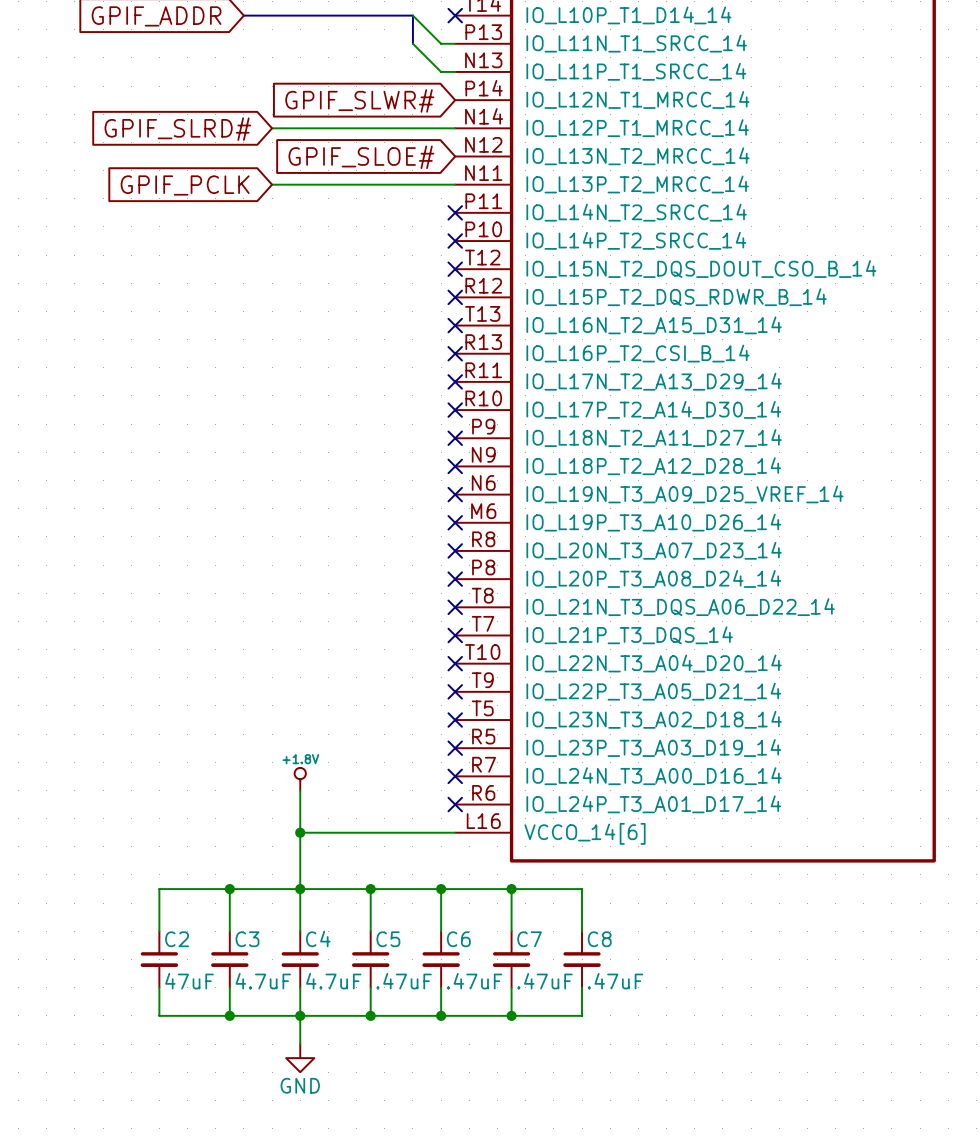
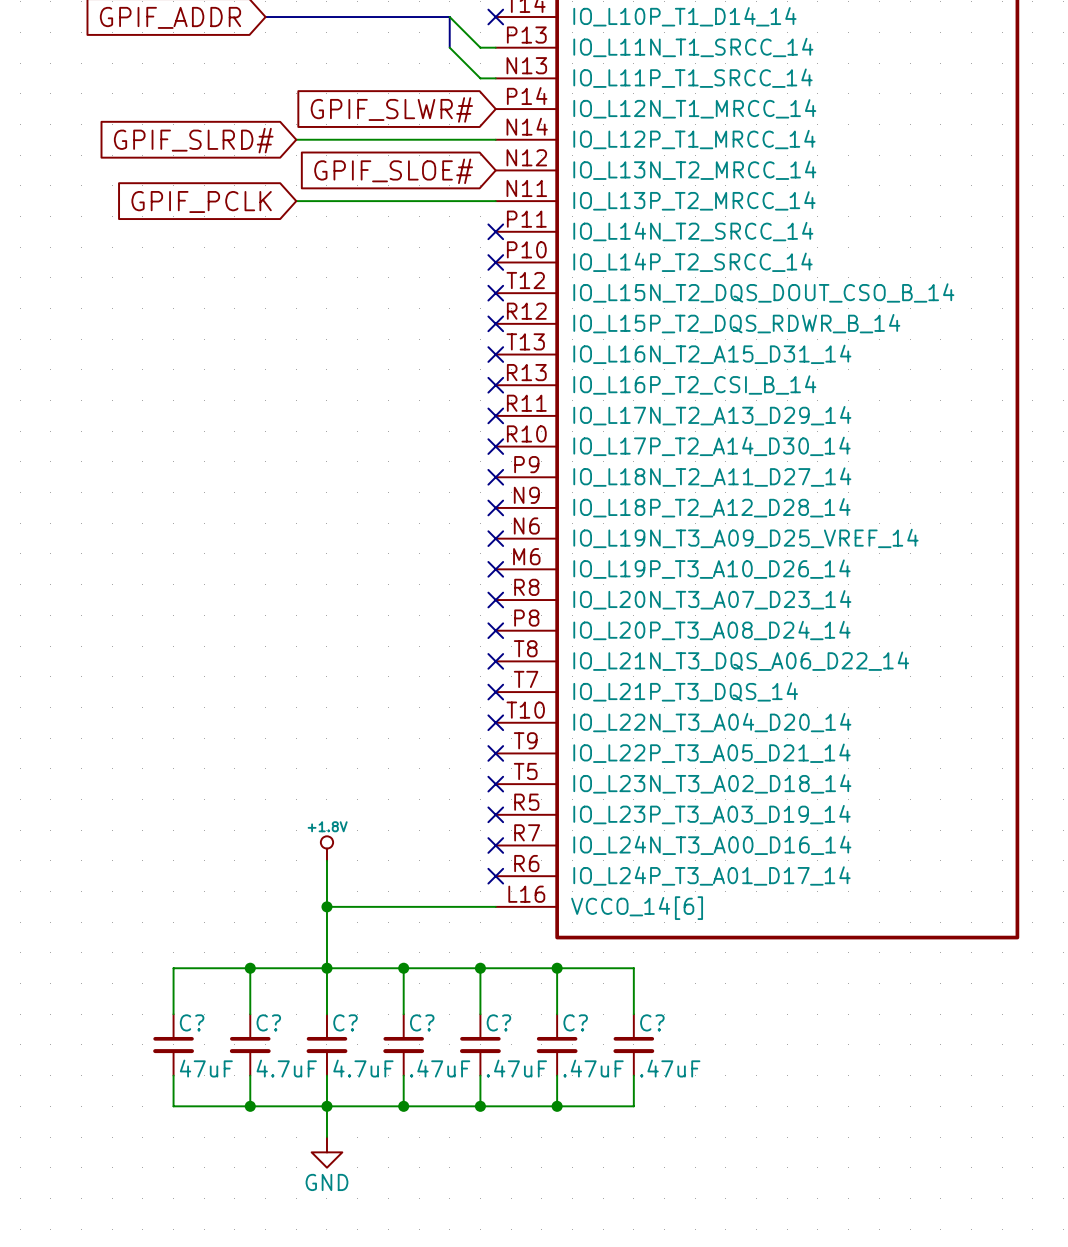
C4 name: C4 (318, 938) -> C? (345, 1022)
C2 name: C2 (177, 939) -> C? (192, 1022)
C3 name: C3 (247, 939) -> C? (268, 1022)
C5 name: C5 (388, 939) -> C? (422, 1022)
C6 name: C6 (458, 939) -> C? (498, 1022)
C7 name: C7 (529, 939) -> C? (575, 1022)
C8 name: C8 (599, 939) -> C? (652, 1022)

